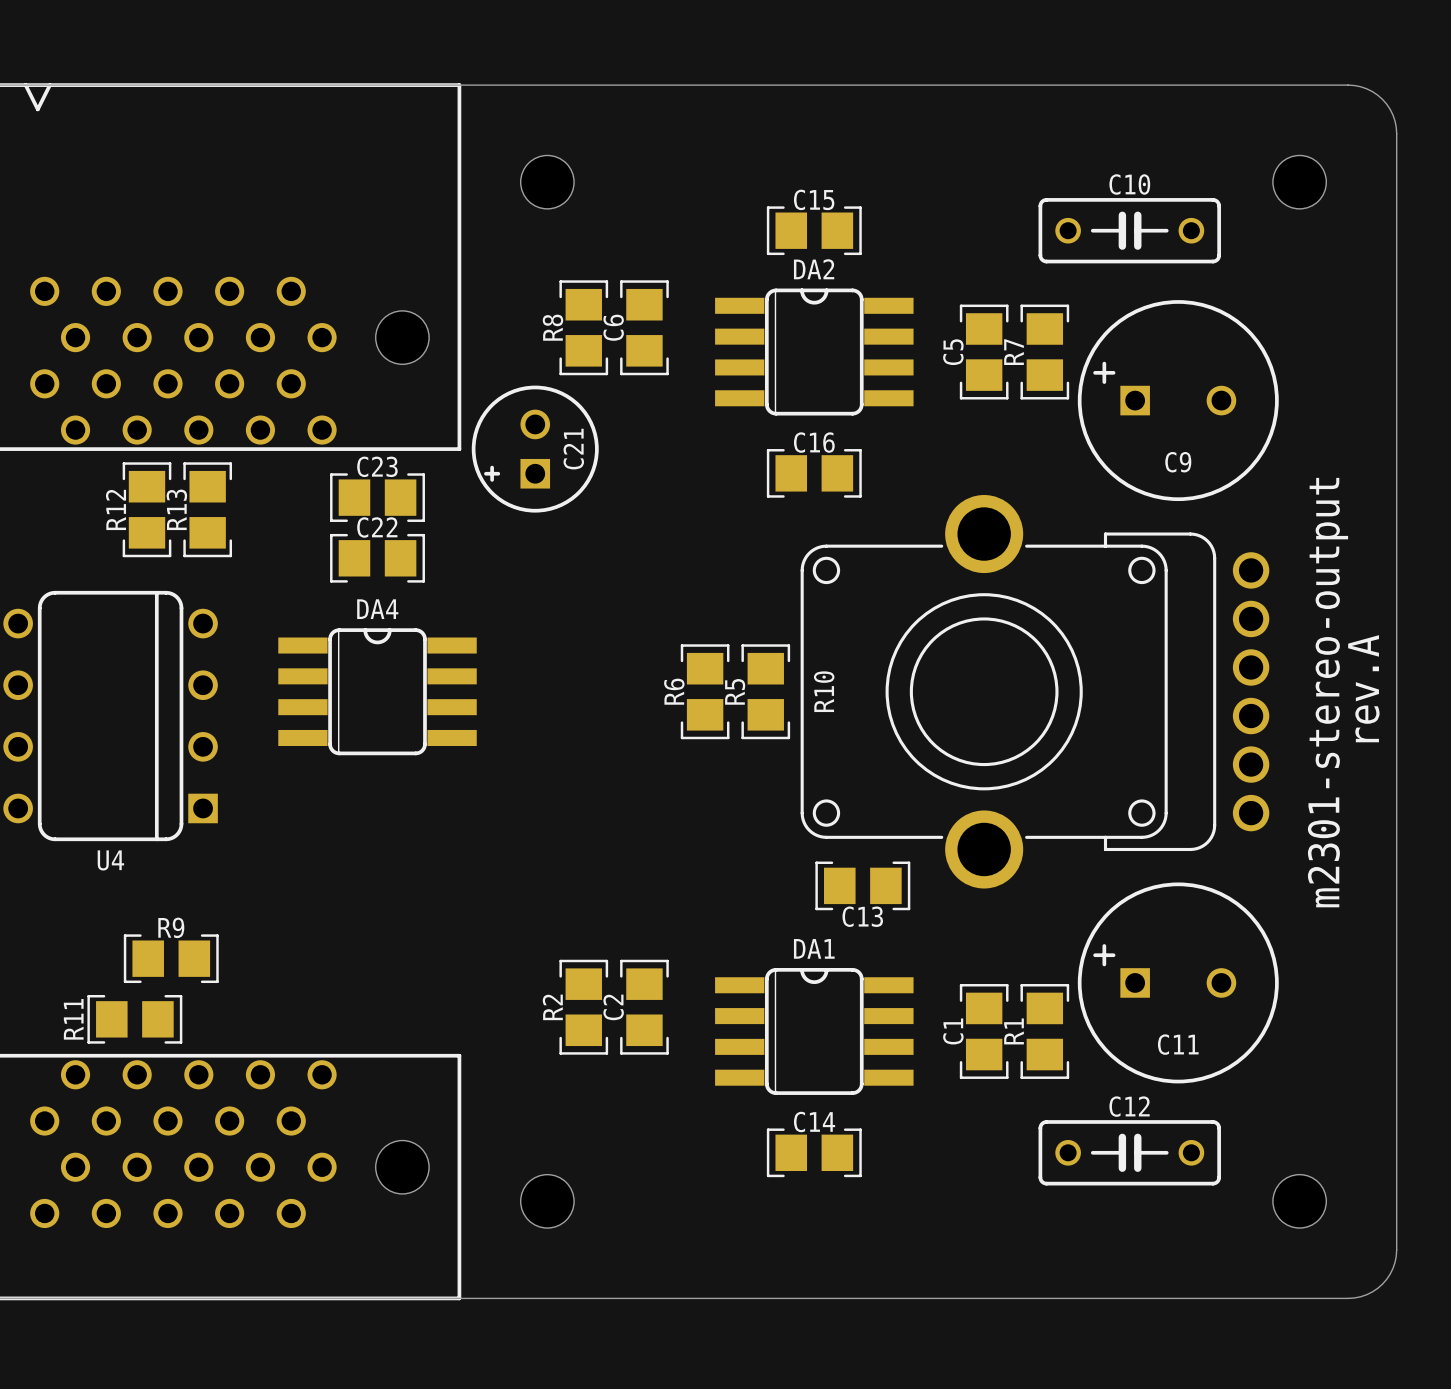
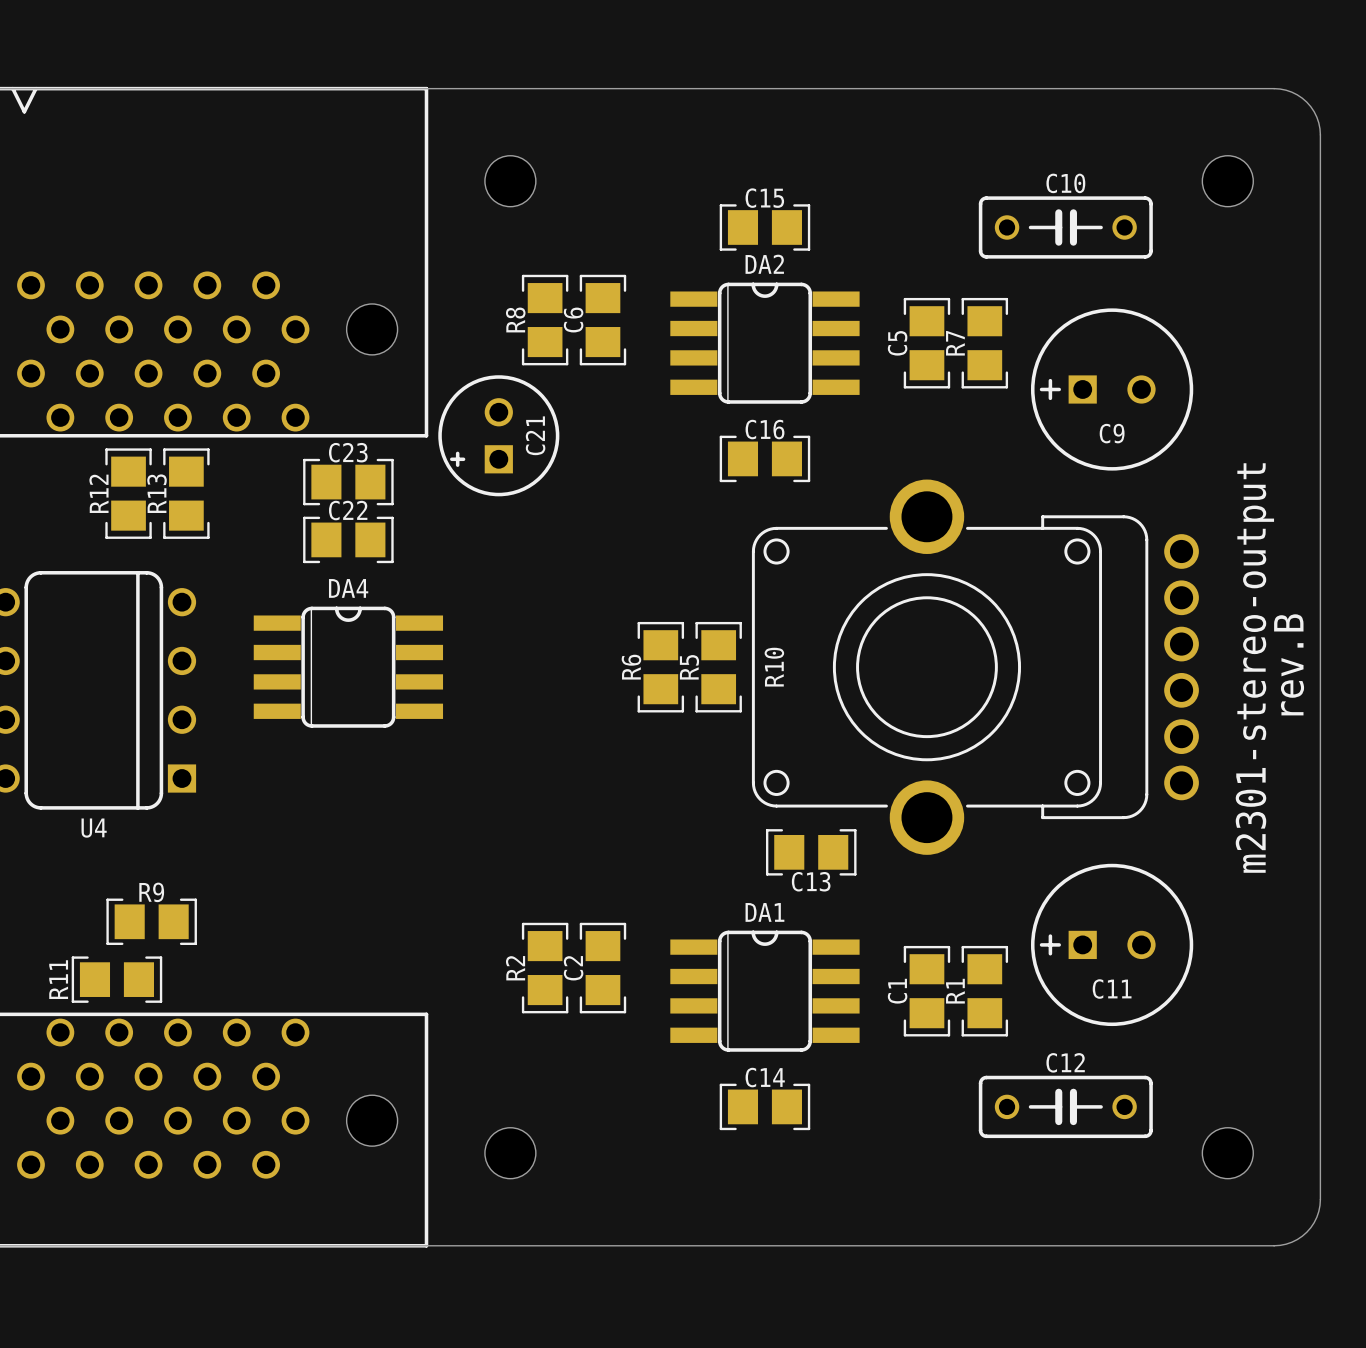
C9 footprint: [1077, 300, 1279, 502] -> [1030, 308, 1194, 471]
part value: rev.A (1363, 688) -> rev.B (1289, 664)
C11 footprint: [1077, 882, 1279, 1084] -> [1030, 863, 1194, 1027]

